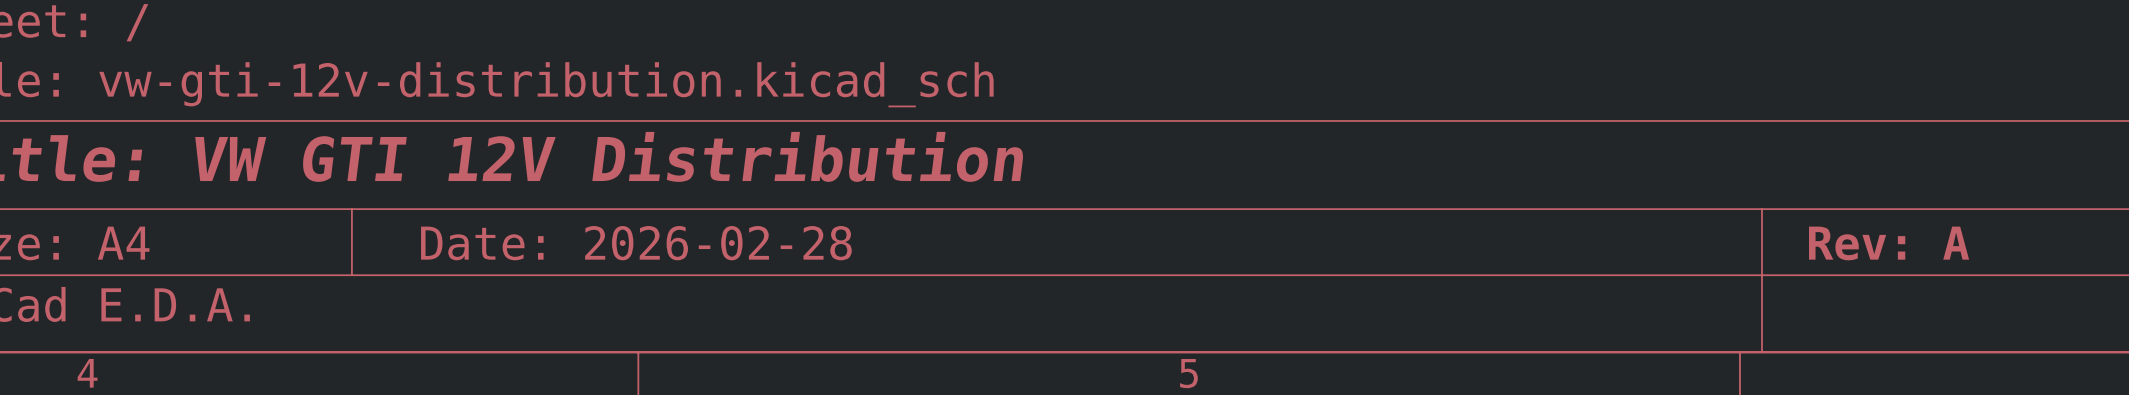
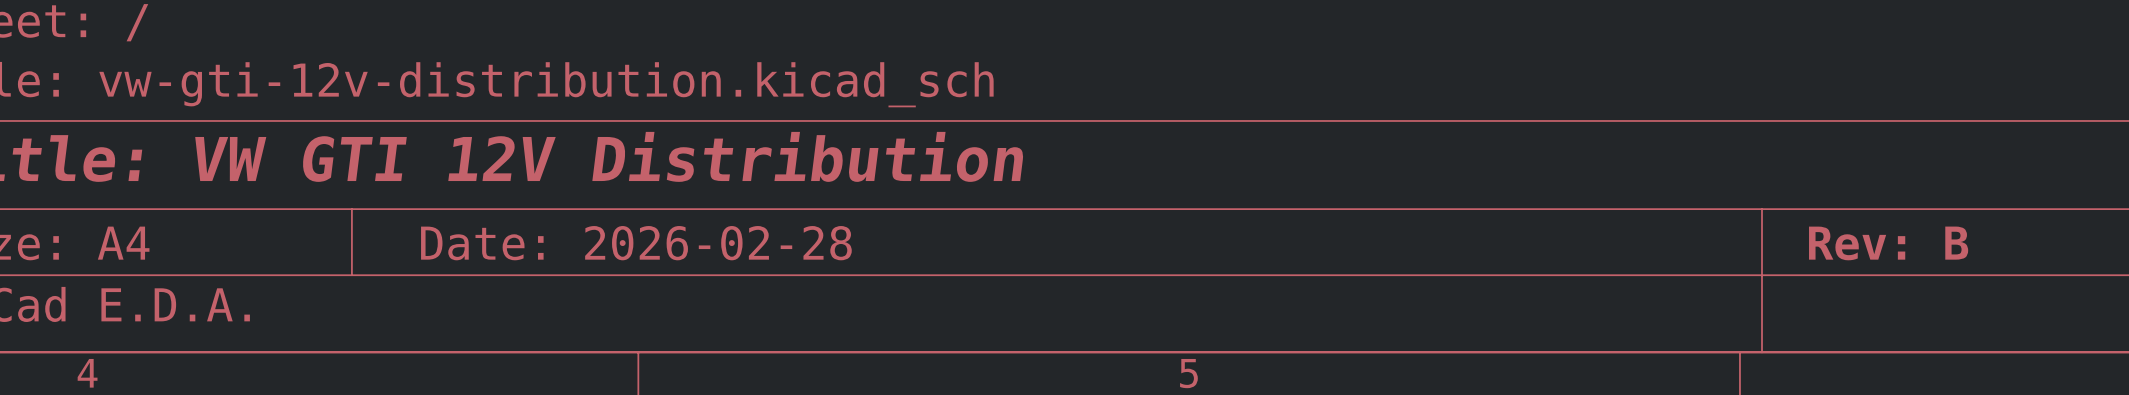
title block: Rev: A (1889, 243) -> Rev: B (1888, 243)

